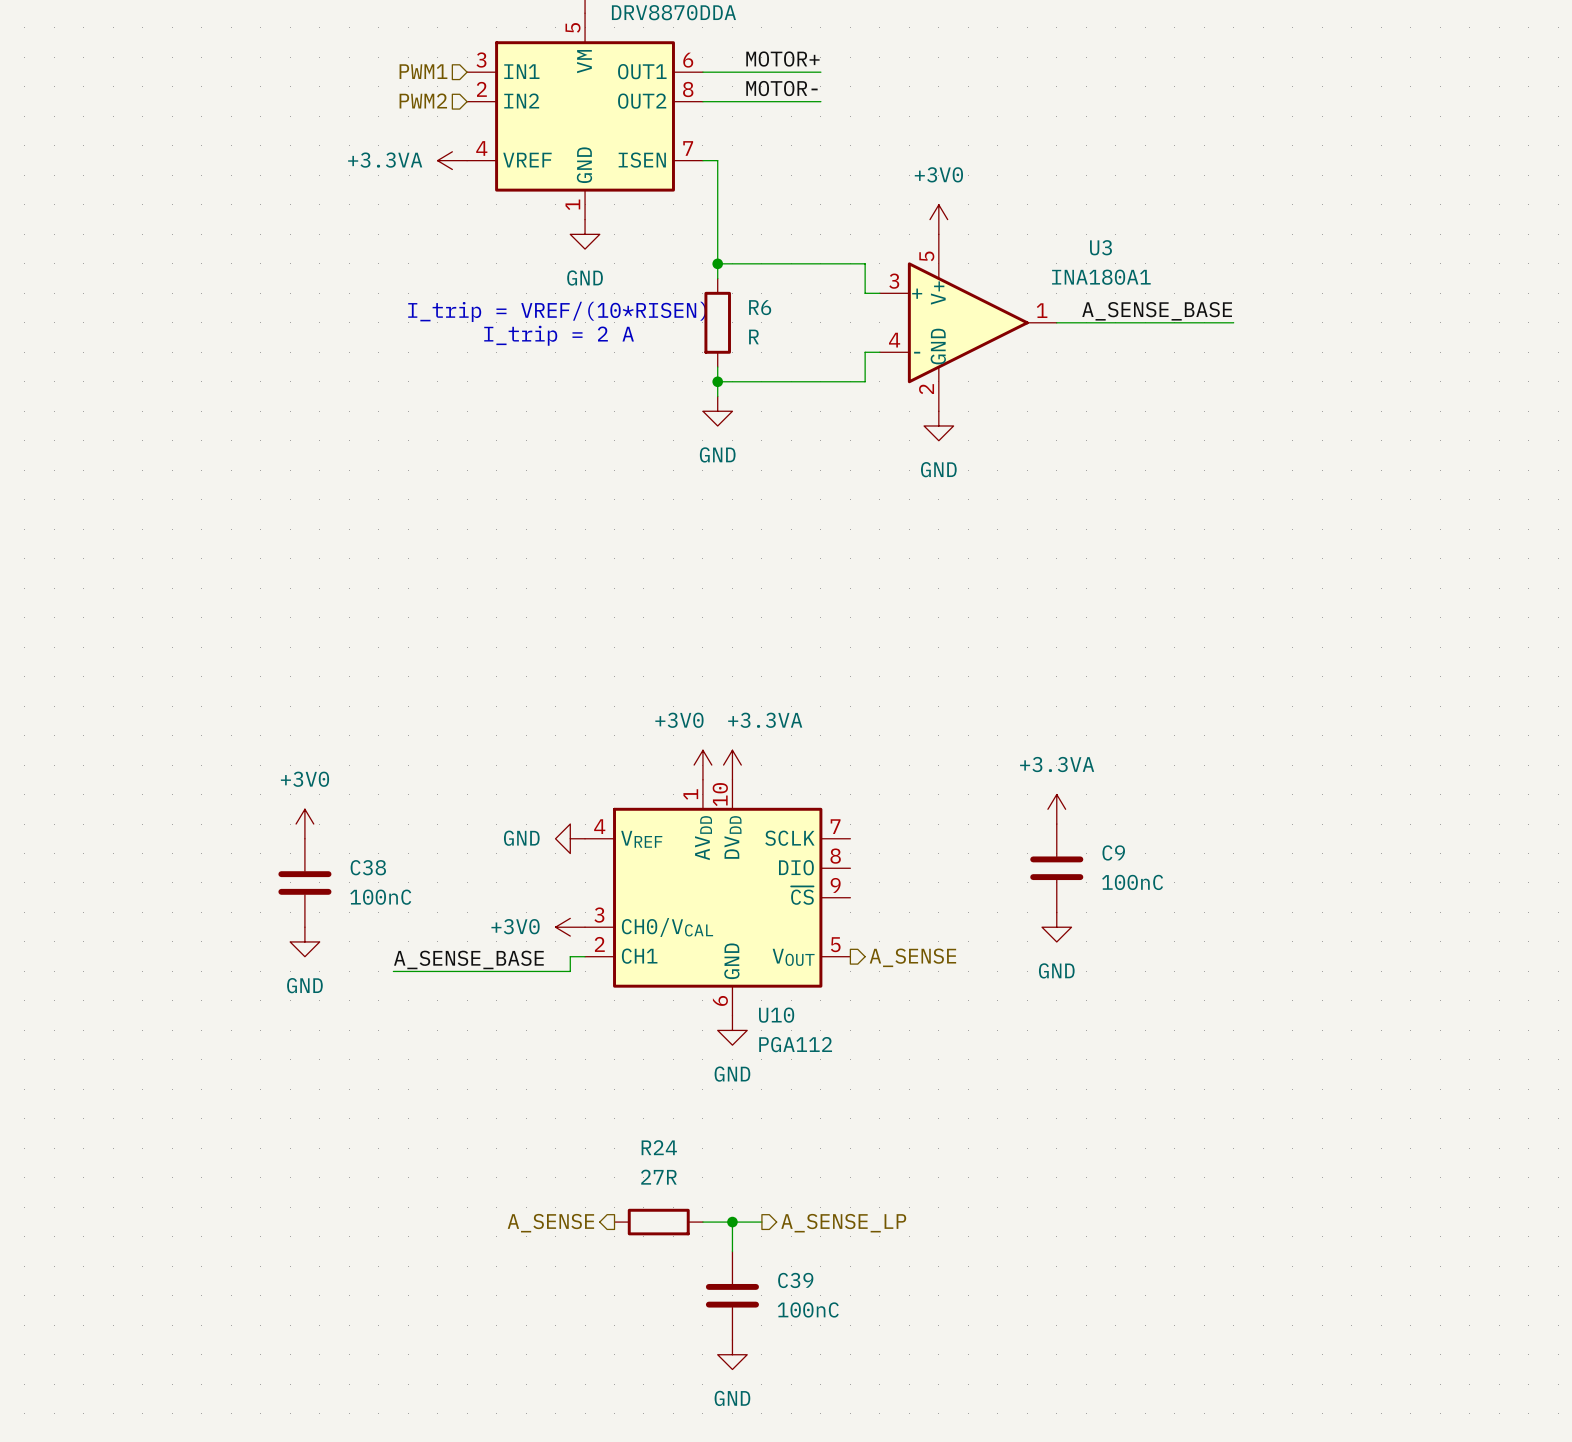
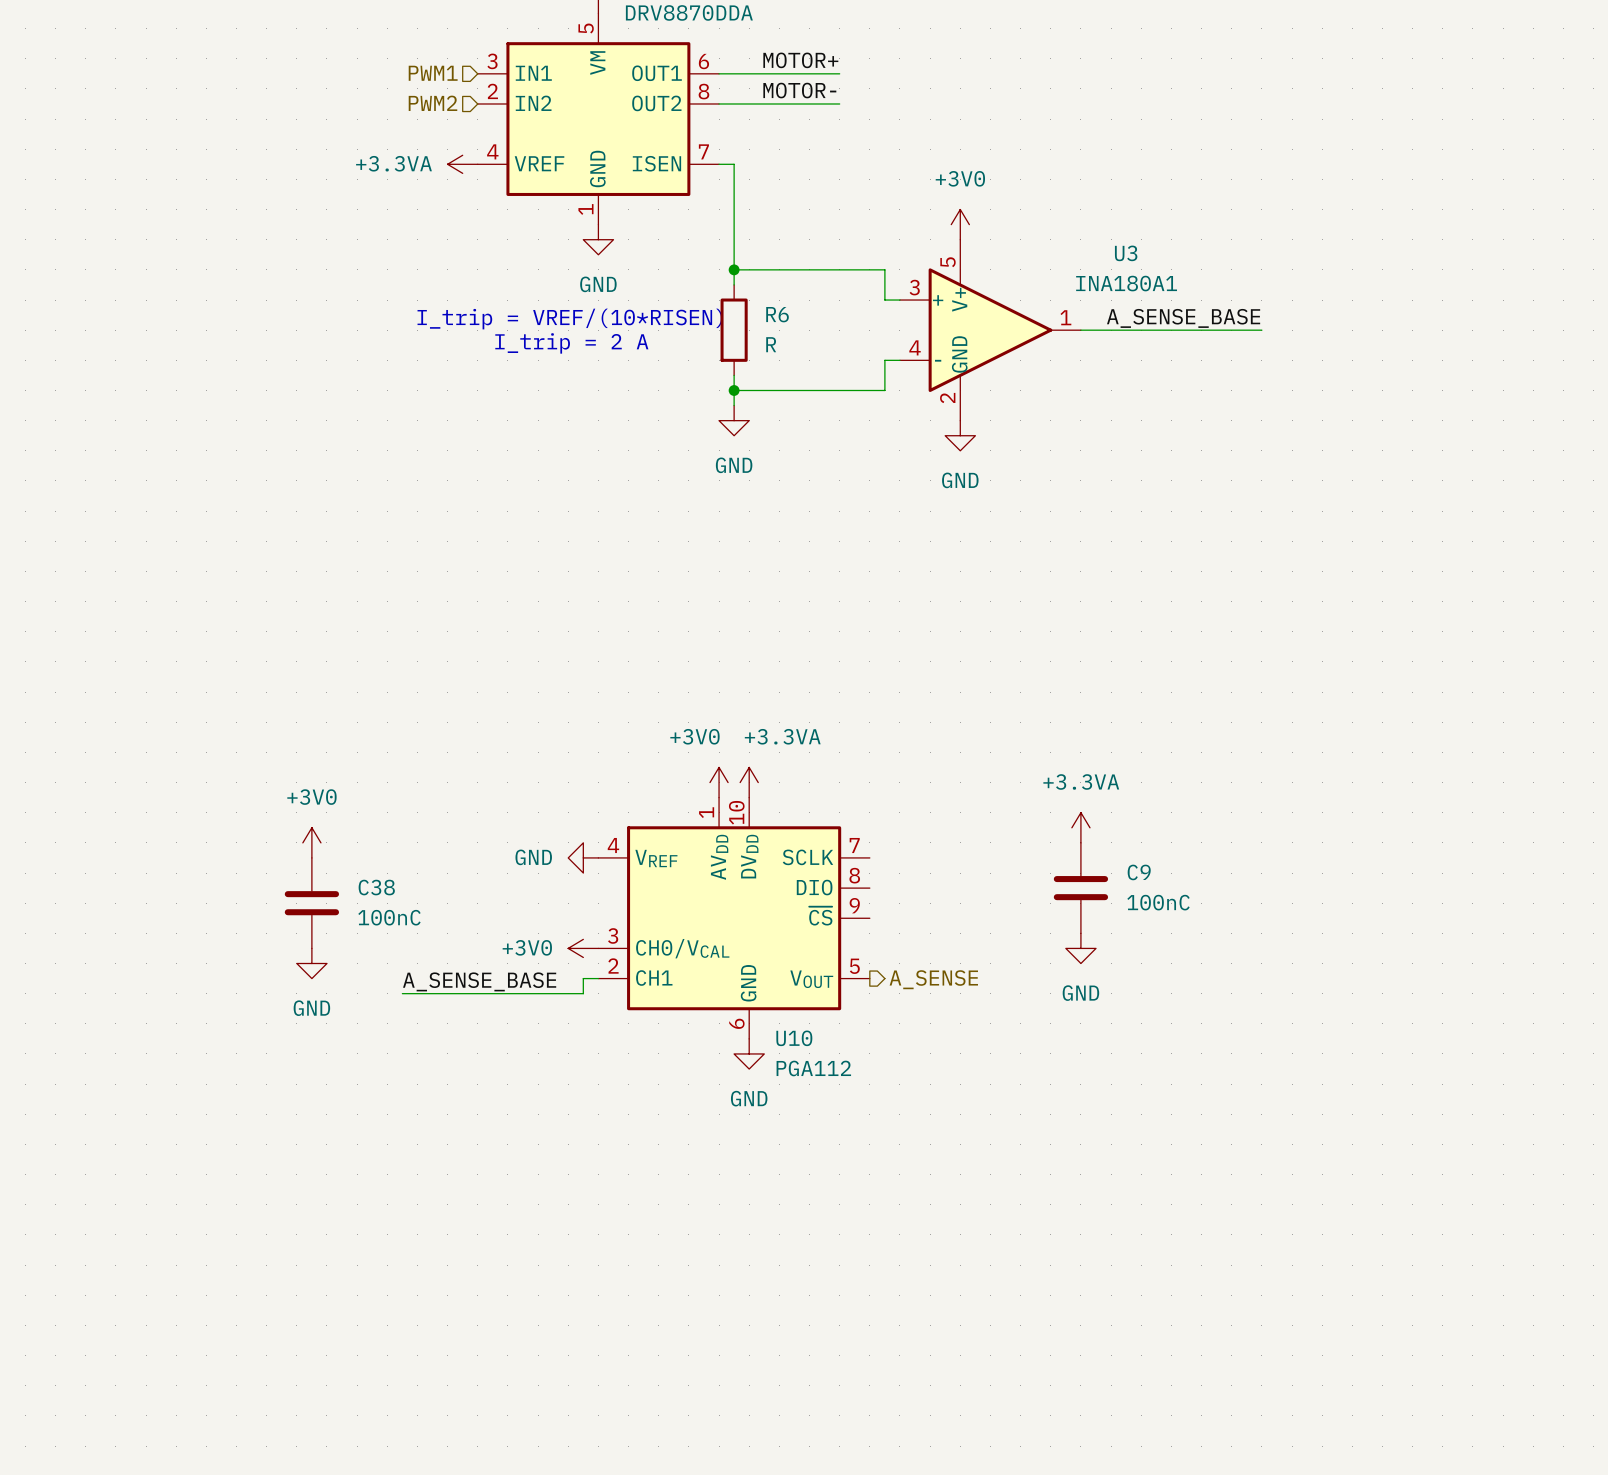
R24: 27R (658, 1222) -> none
wire: (702, 1222) (761, 1222) -> none
wire: (732, 1222) (732, 1251) -> none
junction: (732, 1222) -> none
hierarchical label: A_SENSE (550, 1223) -> none
hierarchical label: A_SENSE_LP (843, 1223) -> none
C39: 100nC (732, 1295) -> none
power symbol: GND (732, 1354) -> none

